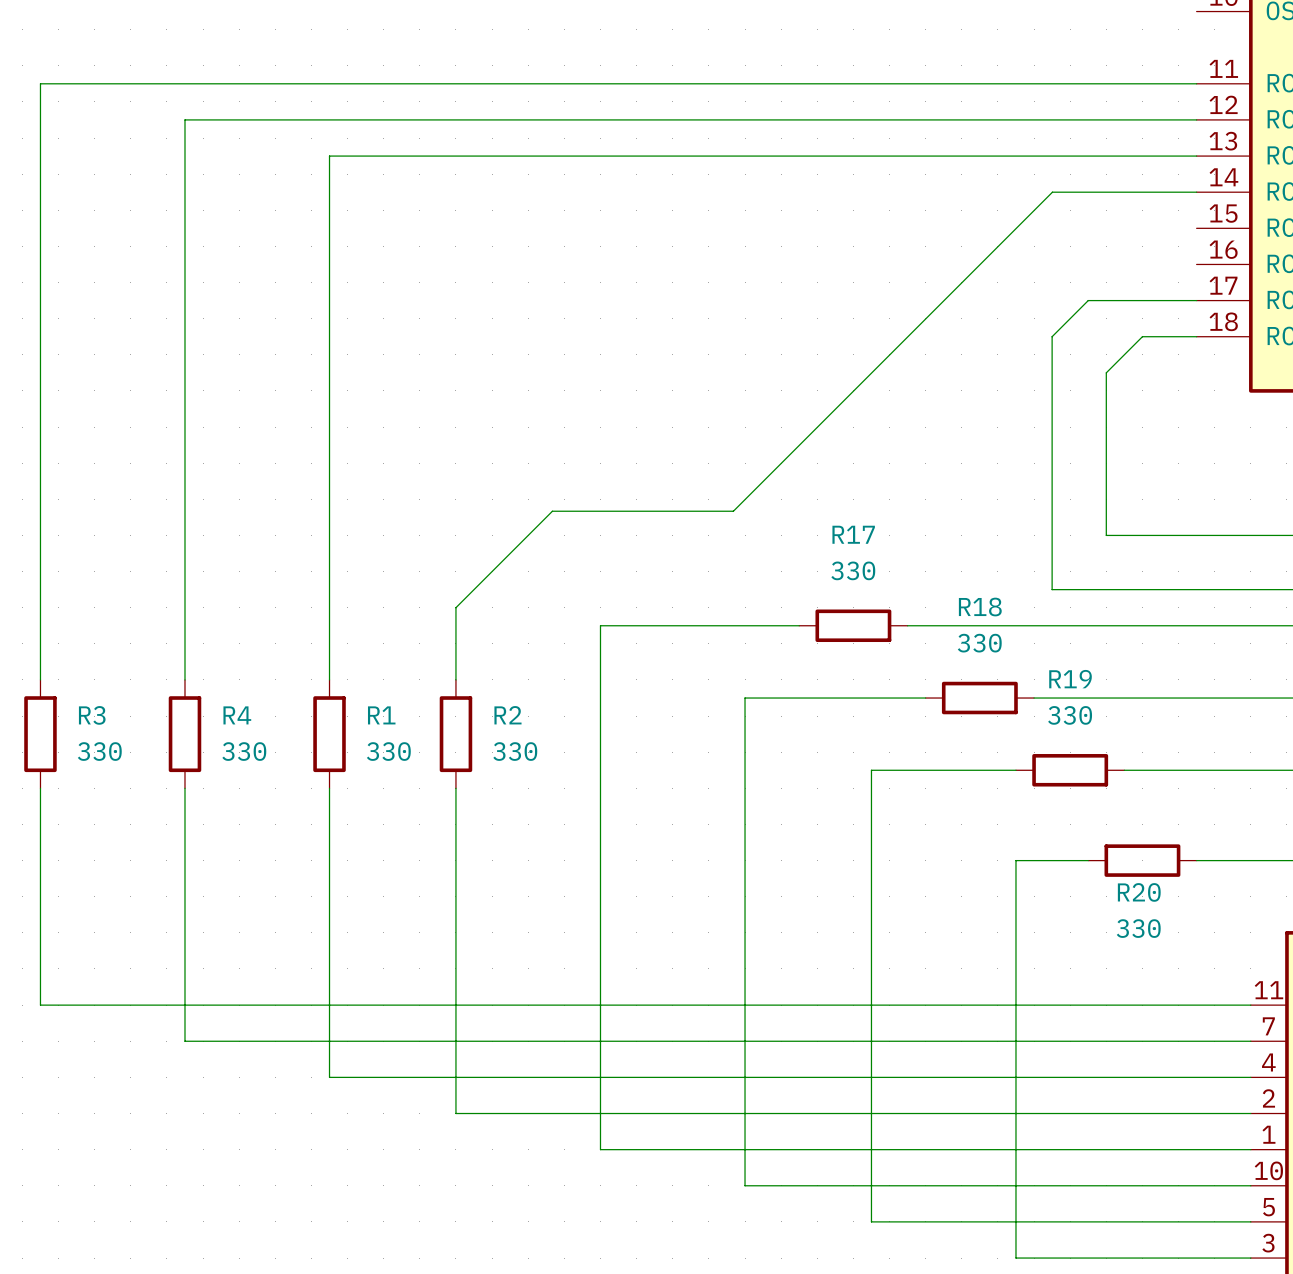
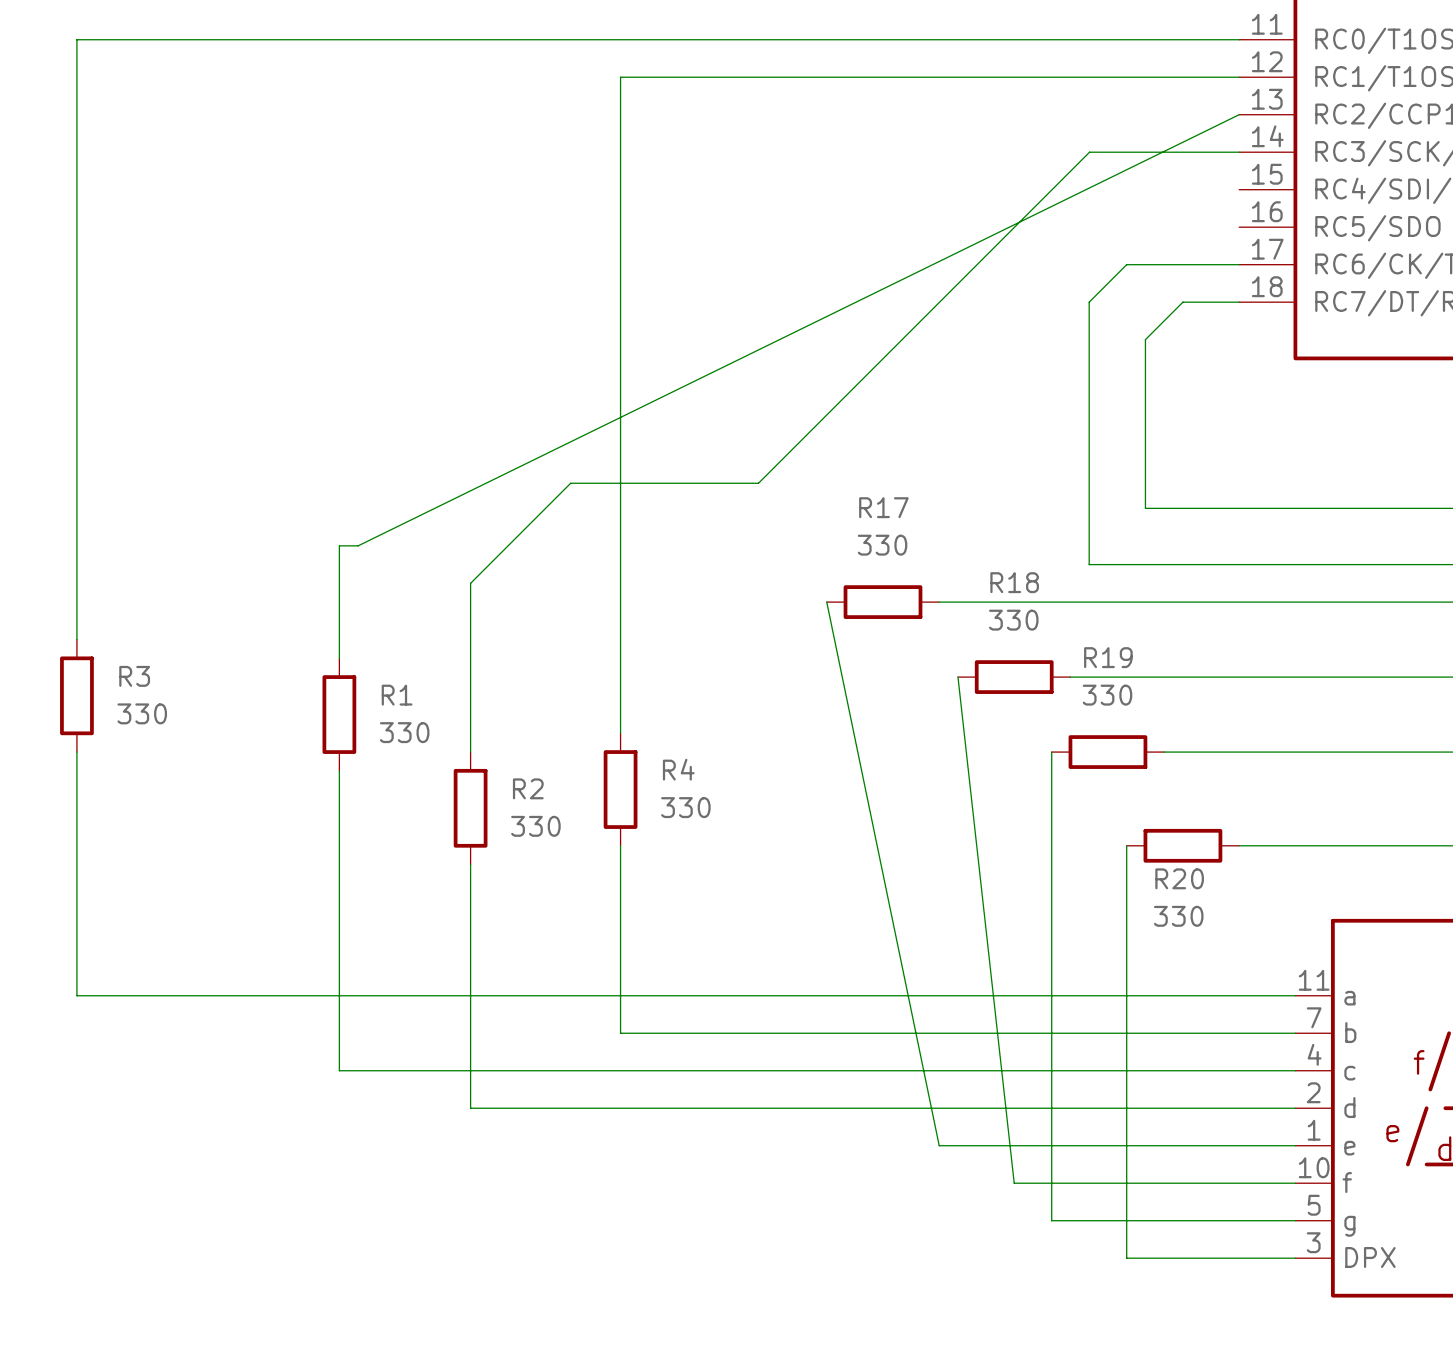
wire: (76, 83) (40, 83) (40, 679) -> (76, 39) (76, 639)
wire: (600, 119) (184, 119) (184, 679) -> (620, 77) (620, 602)
wire: (1196, 156) (329, 156) (329, 571) -> (1239, 114) (358, 545) (339, 545)
wire: (600, 625) (799, 625) -> (939, 1145) (826, 602)
wire: (925, 698) (745, 698) (745, 1185) (979, 1185) -> (957, 677) (1014, 1183)
R3 position: (40, 734) -> (76, 695)
R4 position: (184, 734) -> (620, 789)
R2 position: (455, 734) -> (470, 808)
wire: (600, 752) (600, 860) -> none
wire: (1015, 770) (871, 770) (871, 1221) (1015, 1221) (1015, 1258) (1088, 1258) -> (1126, 845) (1126, 1258)
wire: (40, 788) (40, 1005) (76, 1005) -> (76, 752) (76, 995)
wire: (184, 788) (184, 1041) (600, 1041) (600, 1149) (907, 1149) -> none
wire: (455, 788) (455, 878) -> (470, 658) (470, 752)
wire: (1015, 860) (1088, 860) -> (1051, 845) (1051, 752)

